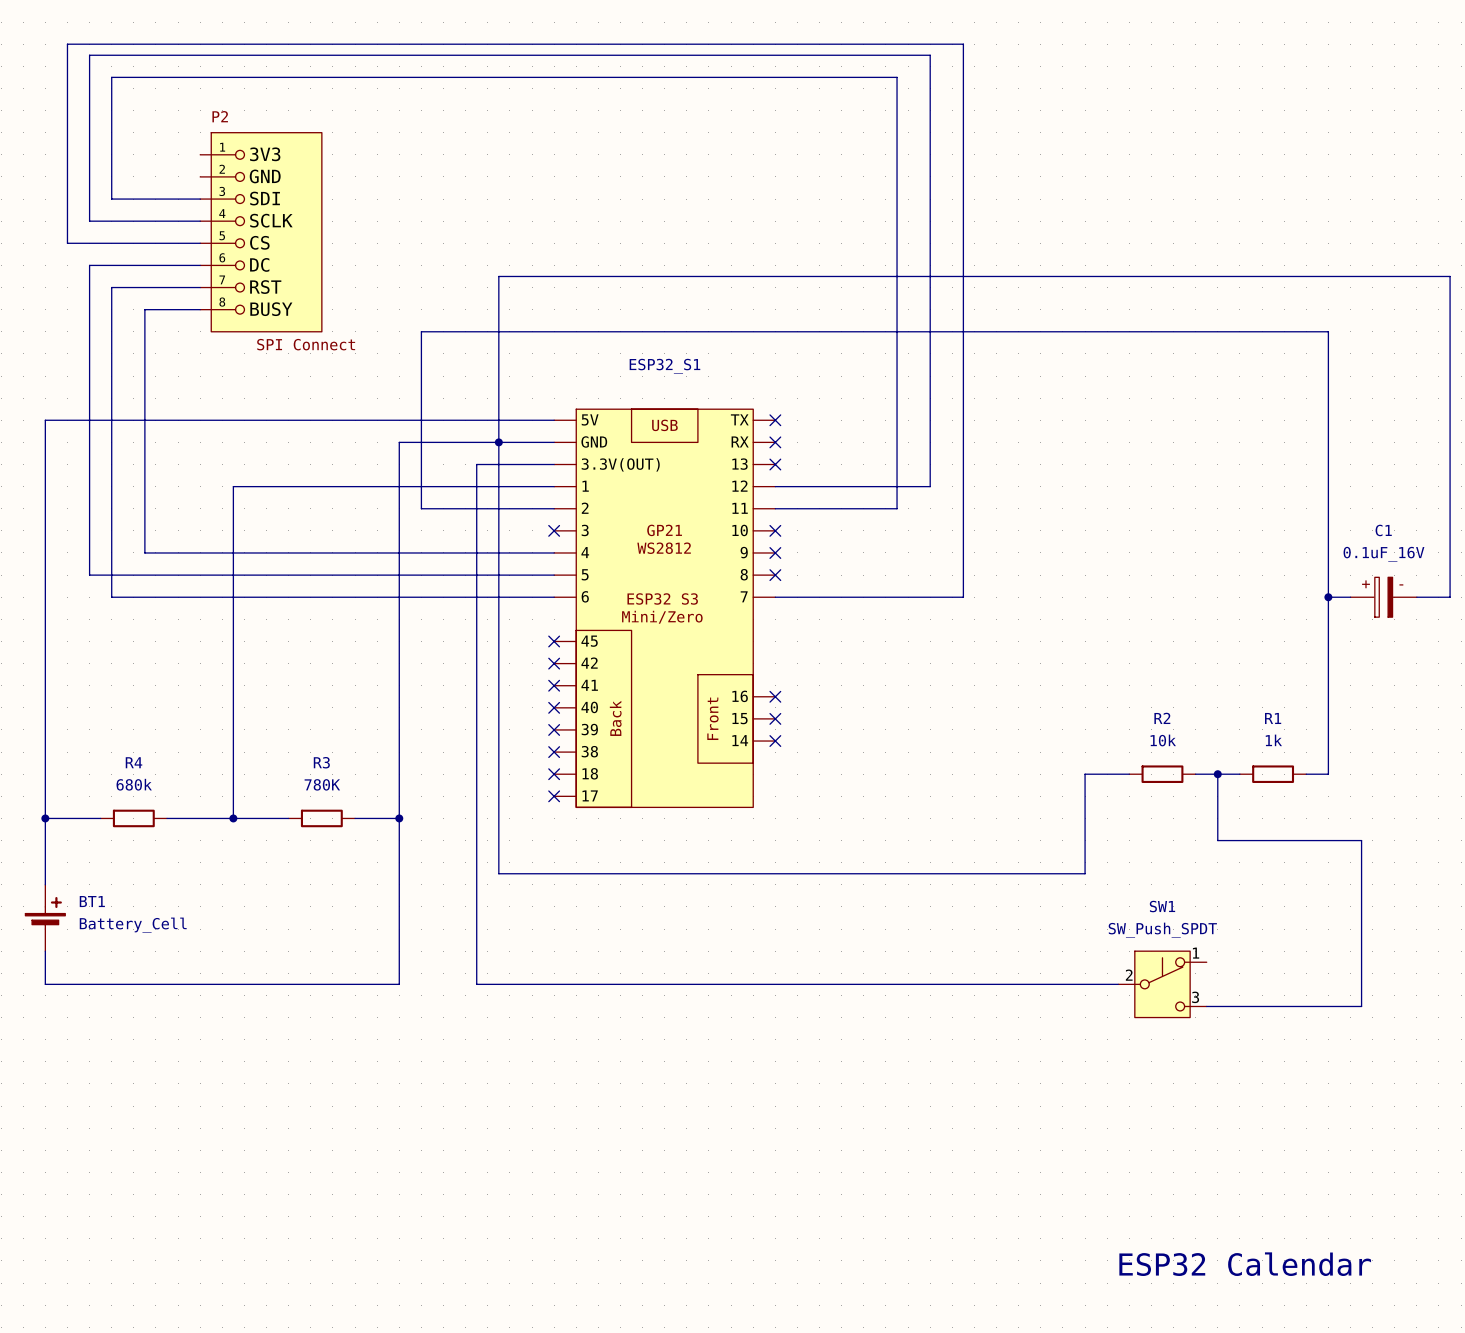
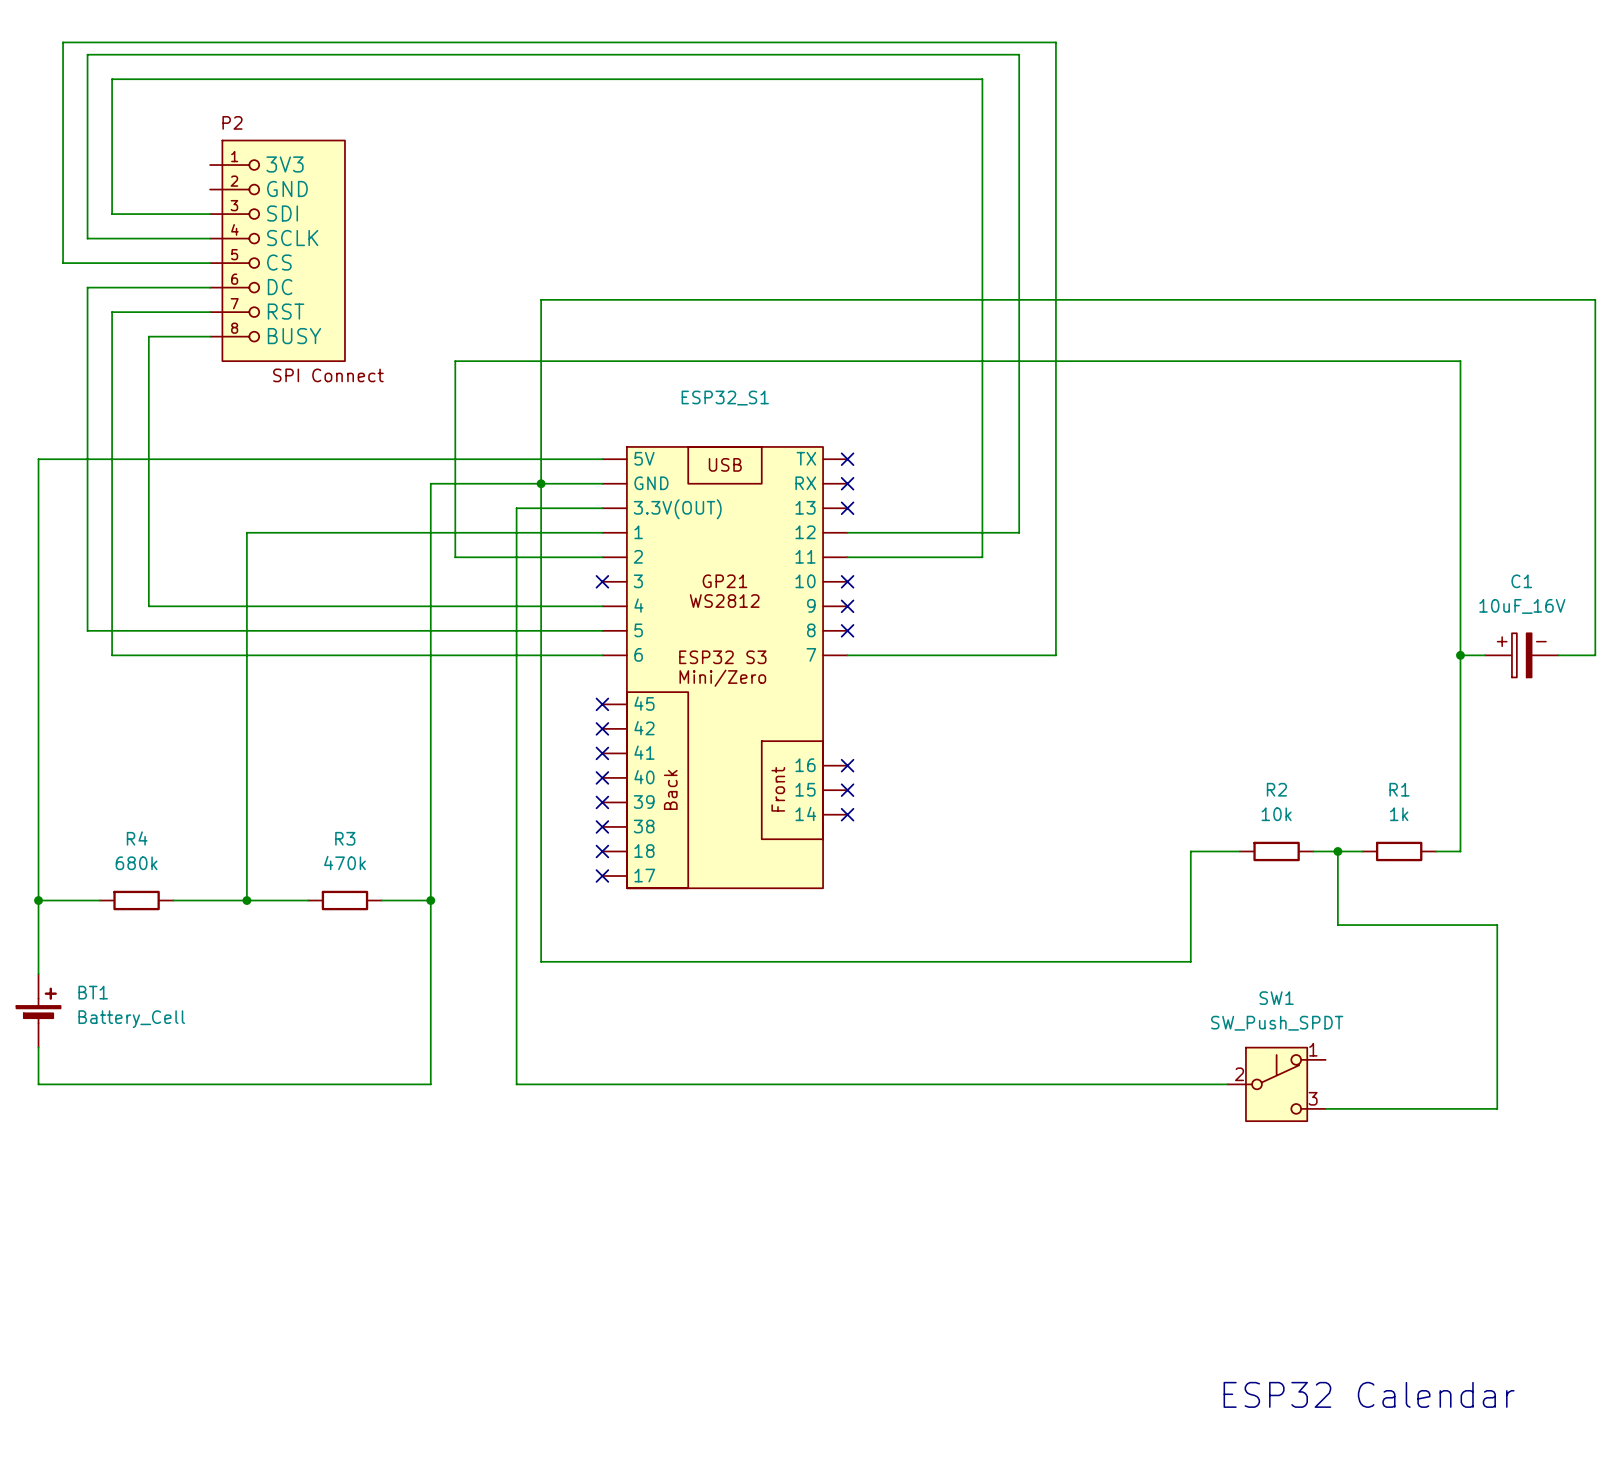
C1 value: 0.1uF_16V (1383, 554) -> 10uF_16V (1522, 606)
R3 value: 780K (322, 784) -> 470k (344, 862)

